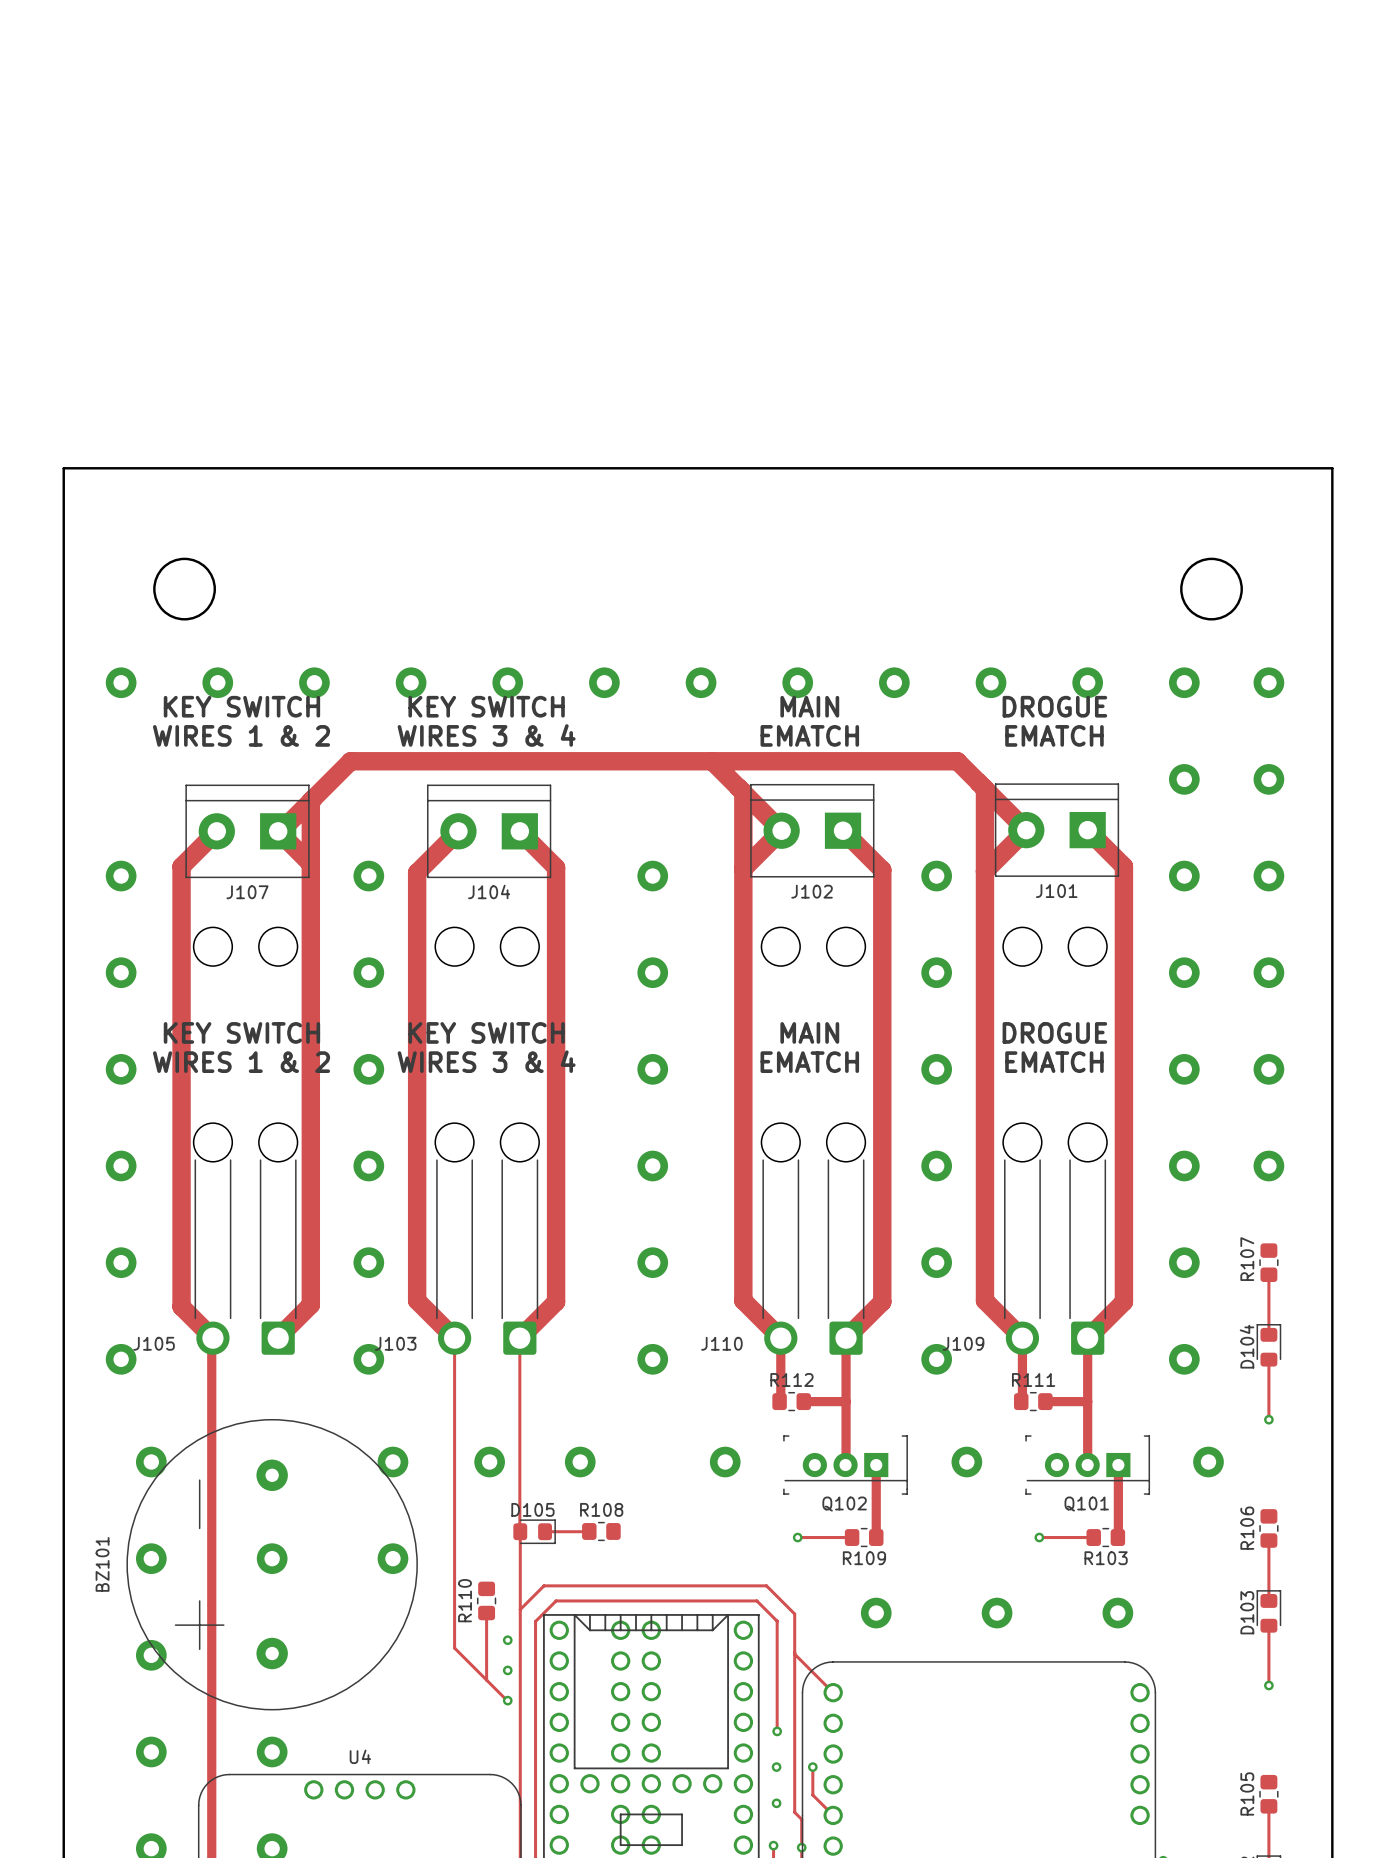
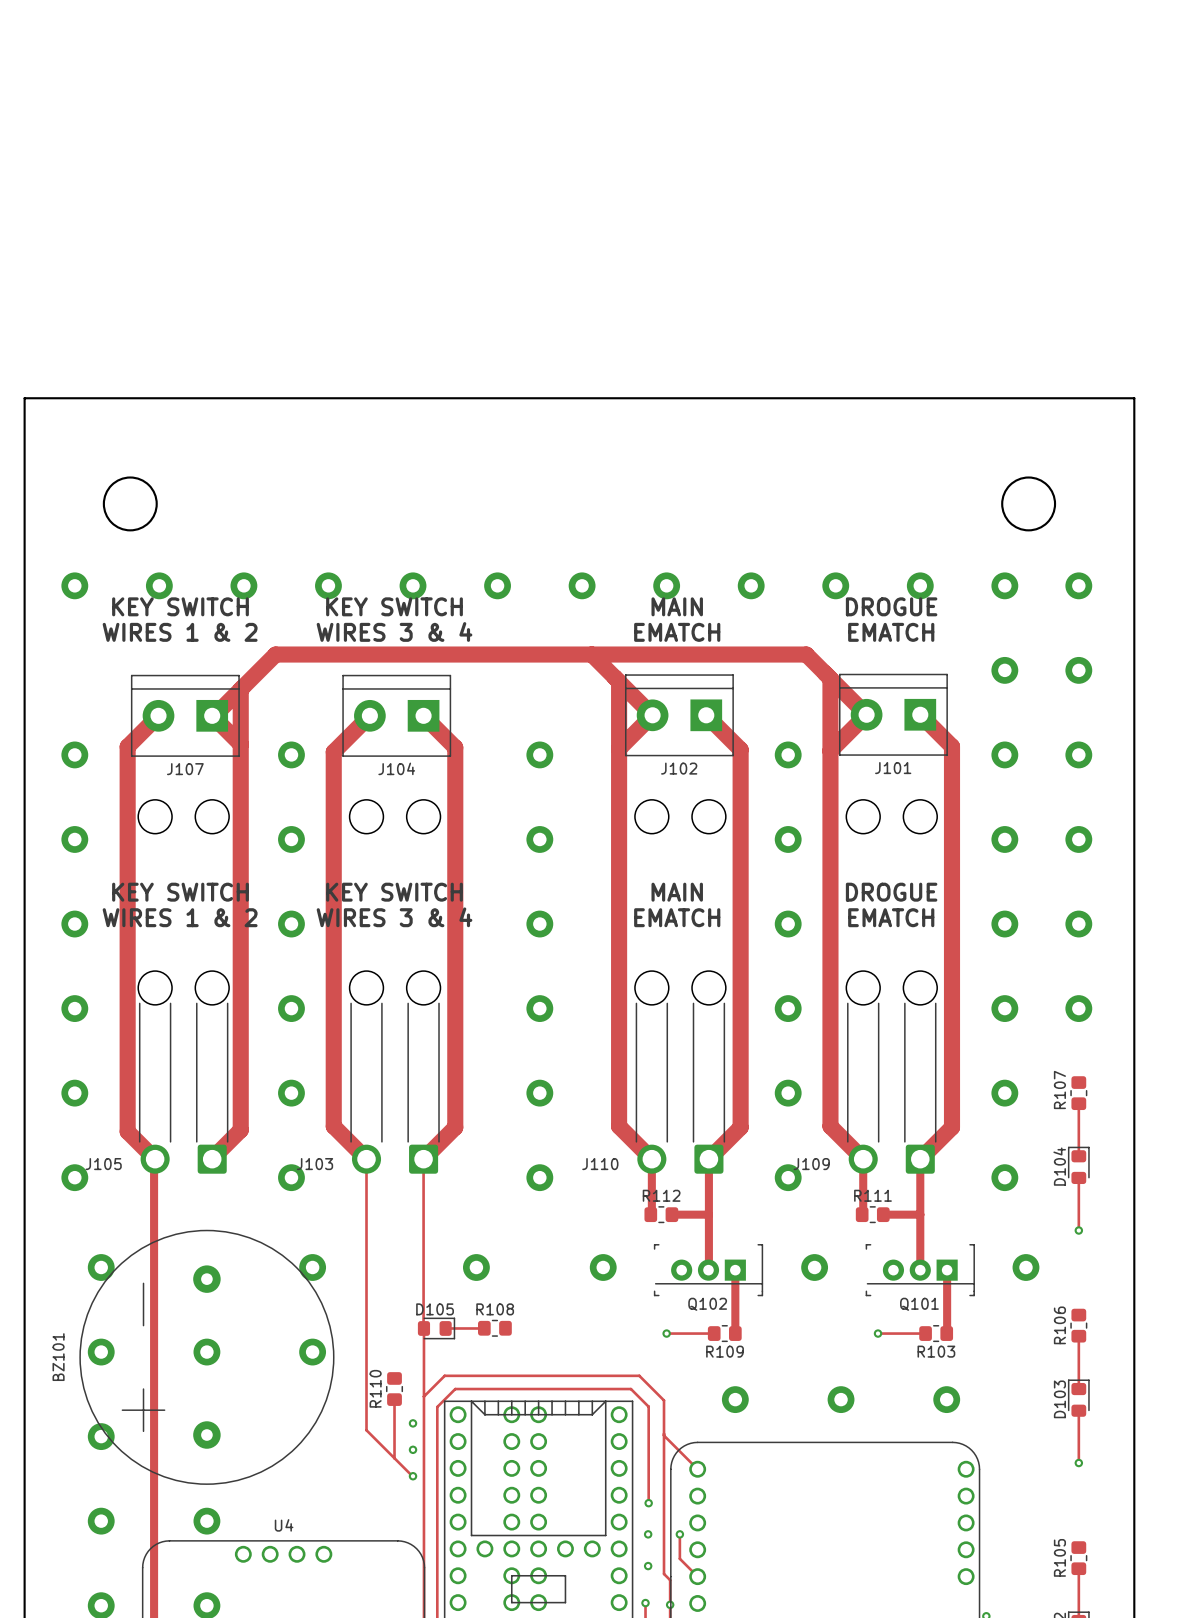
via: (489, 1462) -> none

